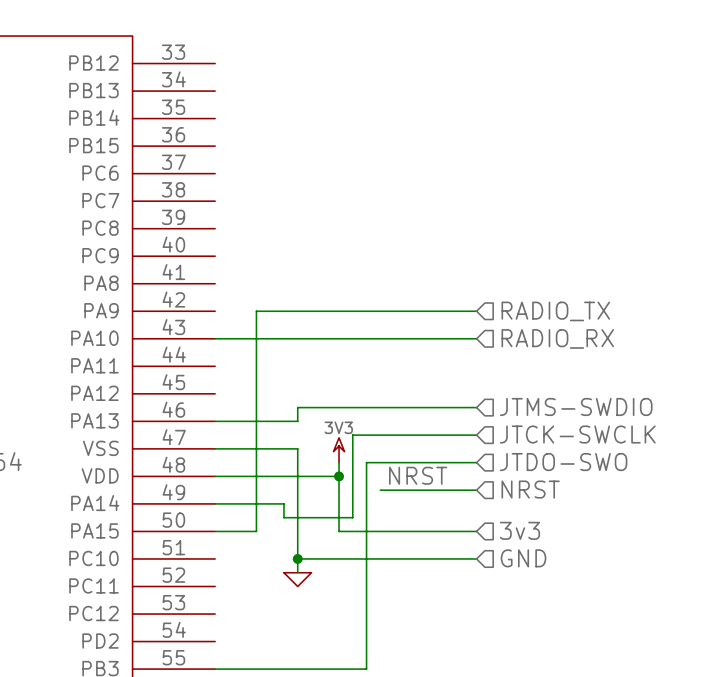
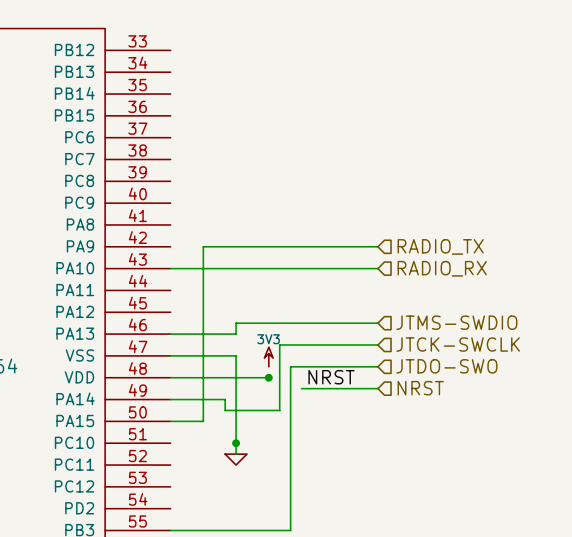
wire: (339, 462) (339, 531) (476, 531) -> none
hierarchical label: 3v3 (519, 530) -> none
wire: (297, 558) (476, 558) -> none
hierarchical label: GND (523, 558) -> none

